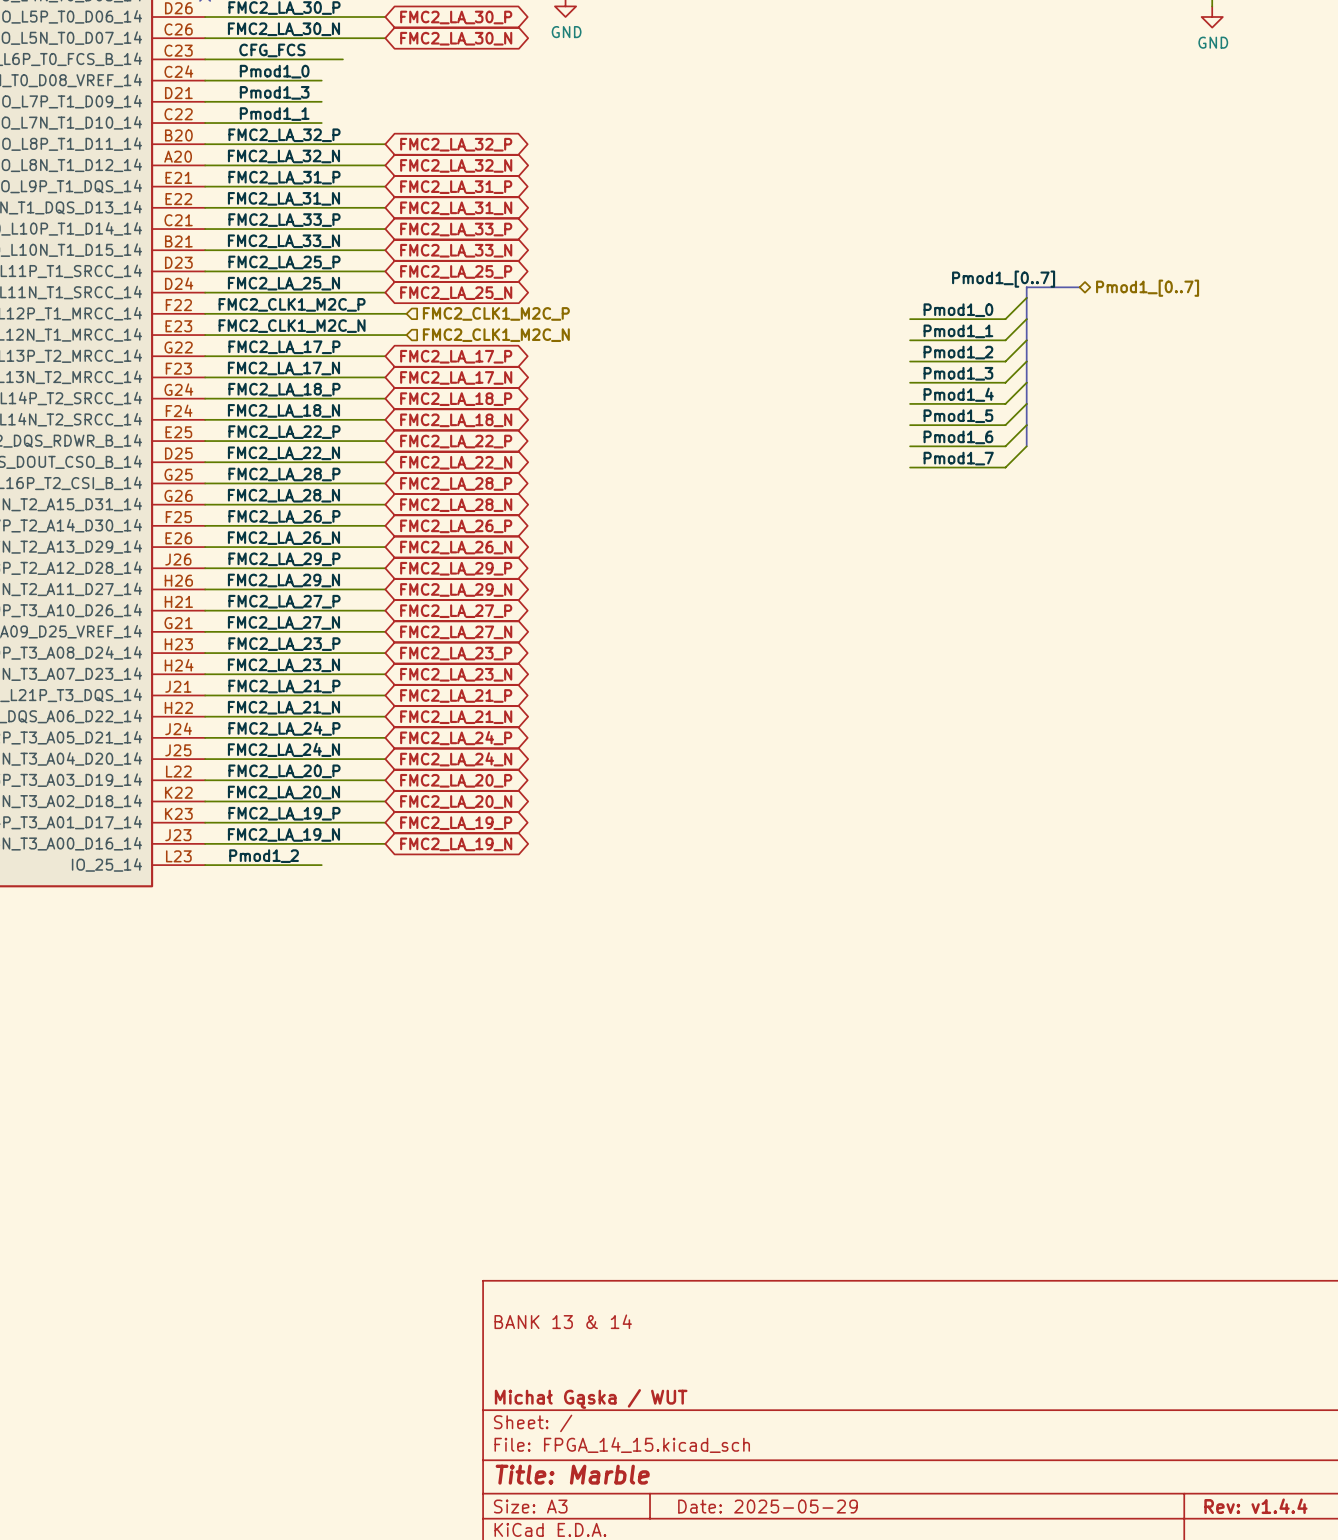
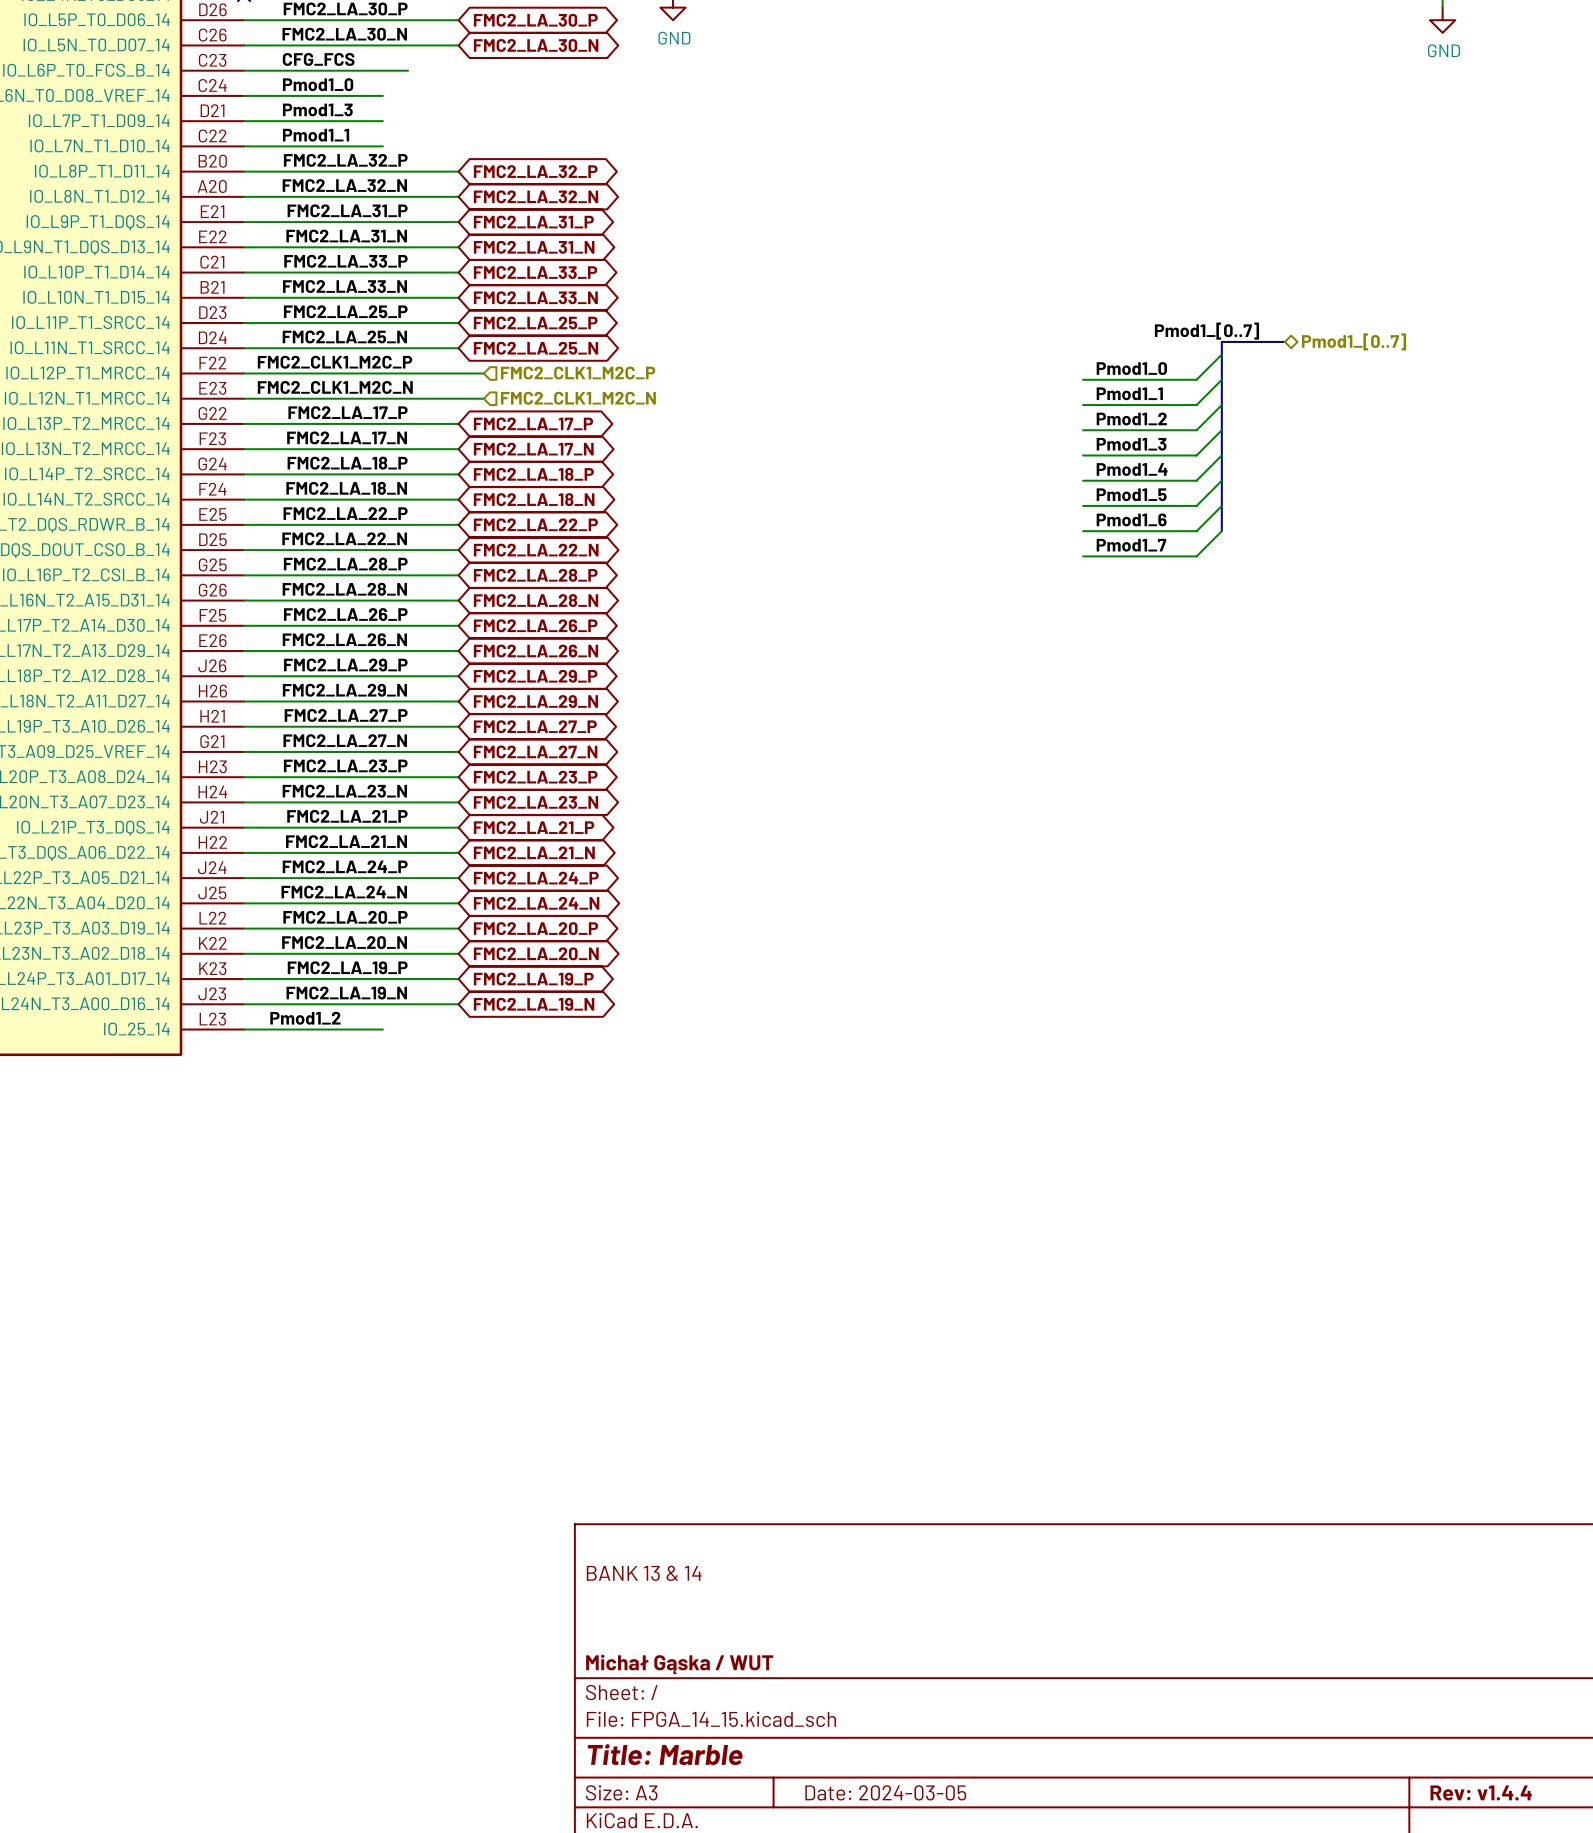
title block: Date: 2025-05-29 (768, 1506) -> Date: 2024-03-05 (885, 1792)

